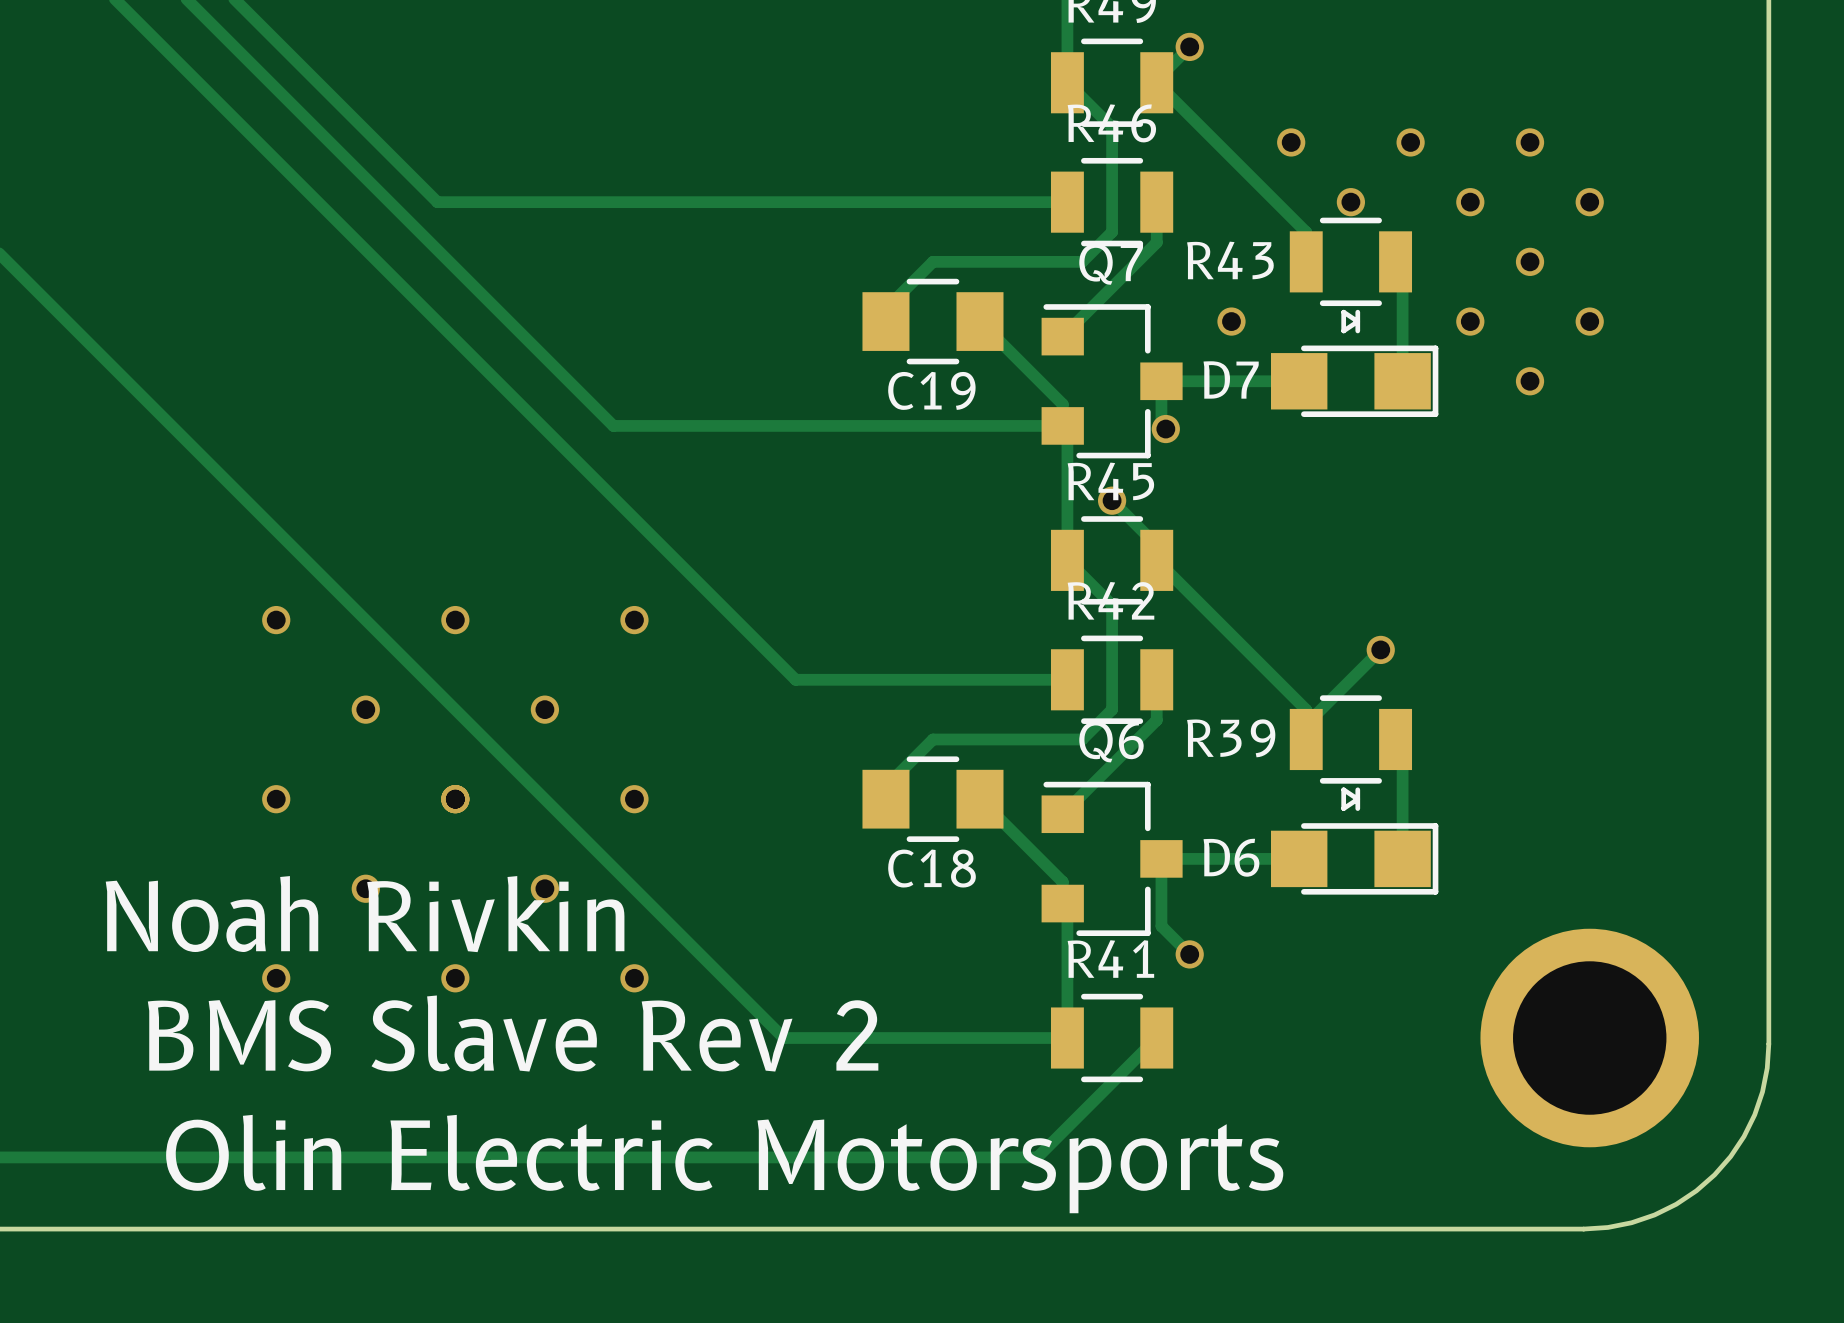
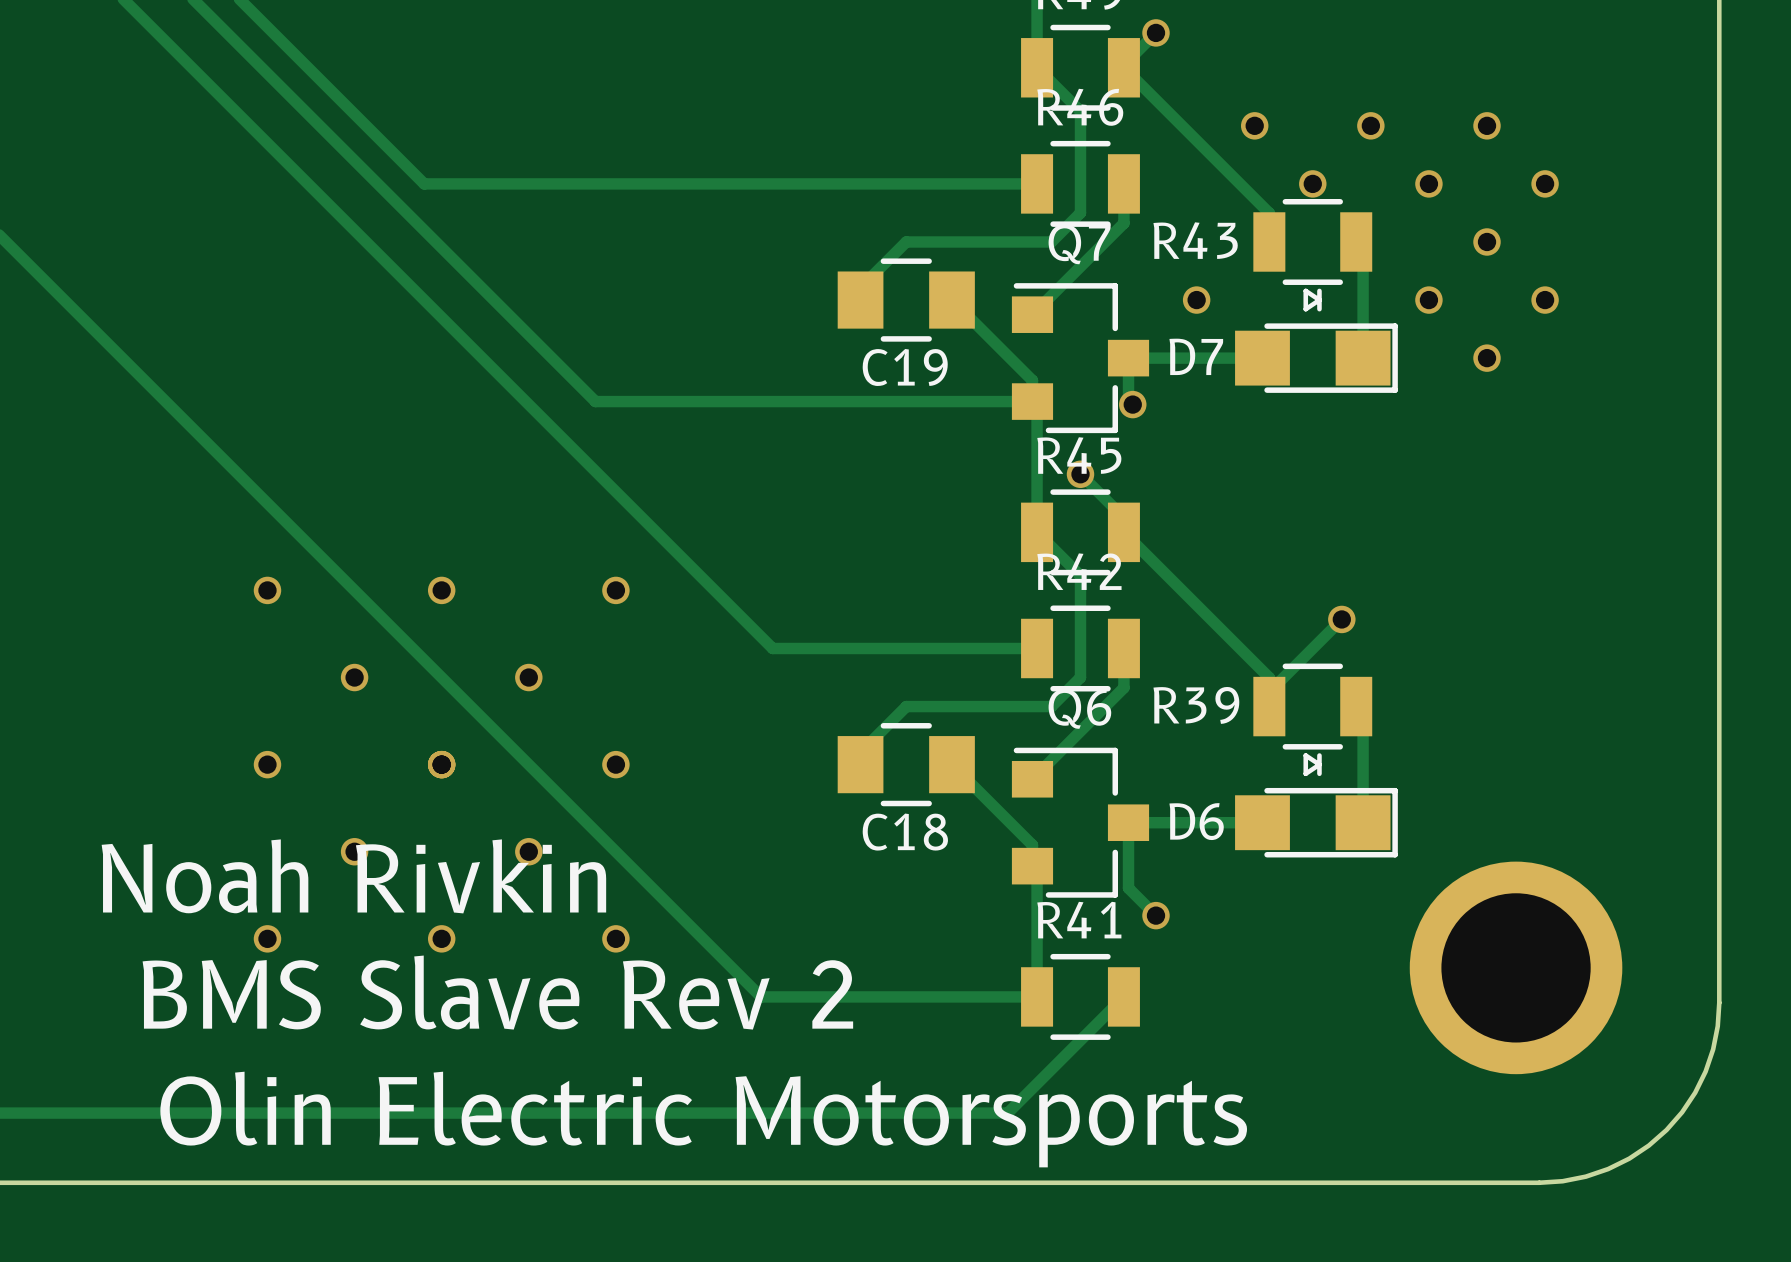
part position: (1589, 1038) -> (1516, 967)

